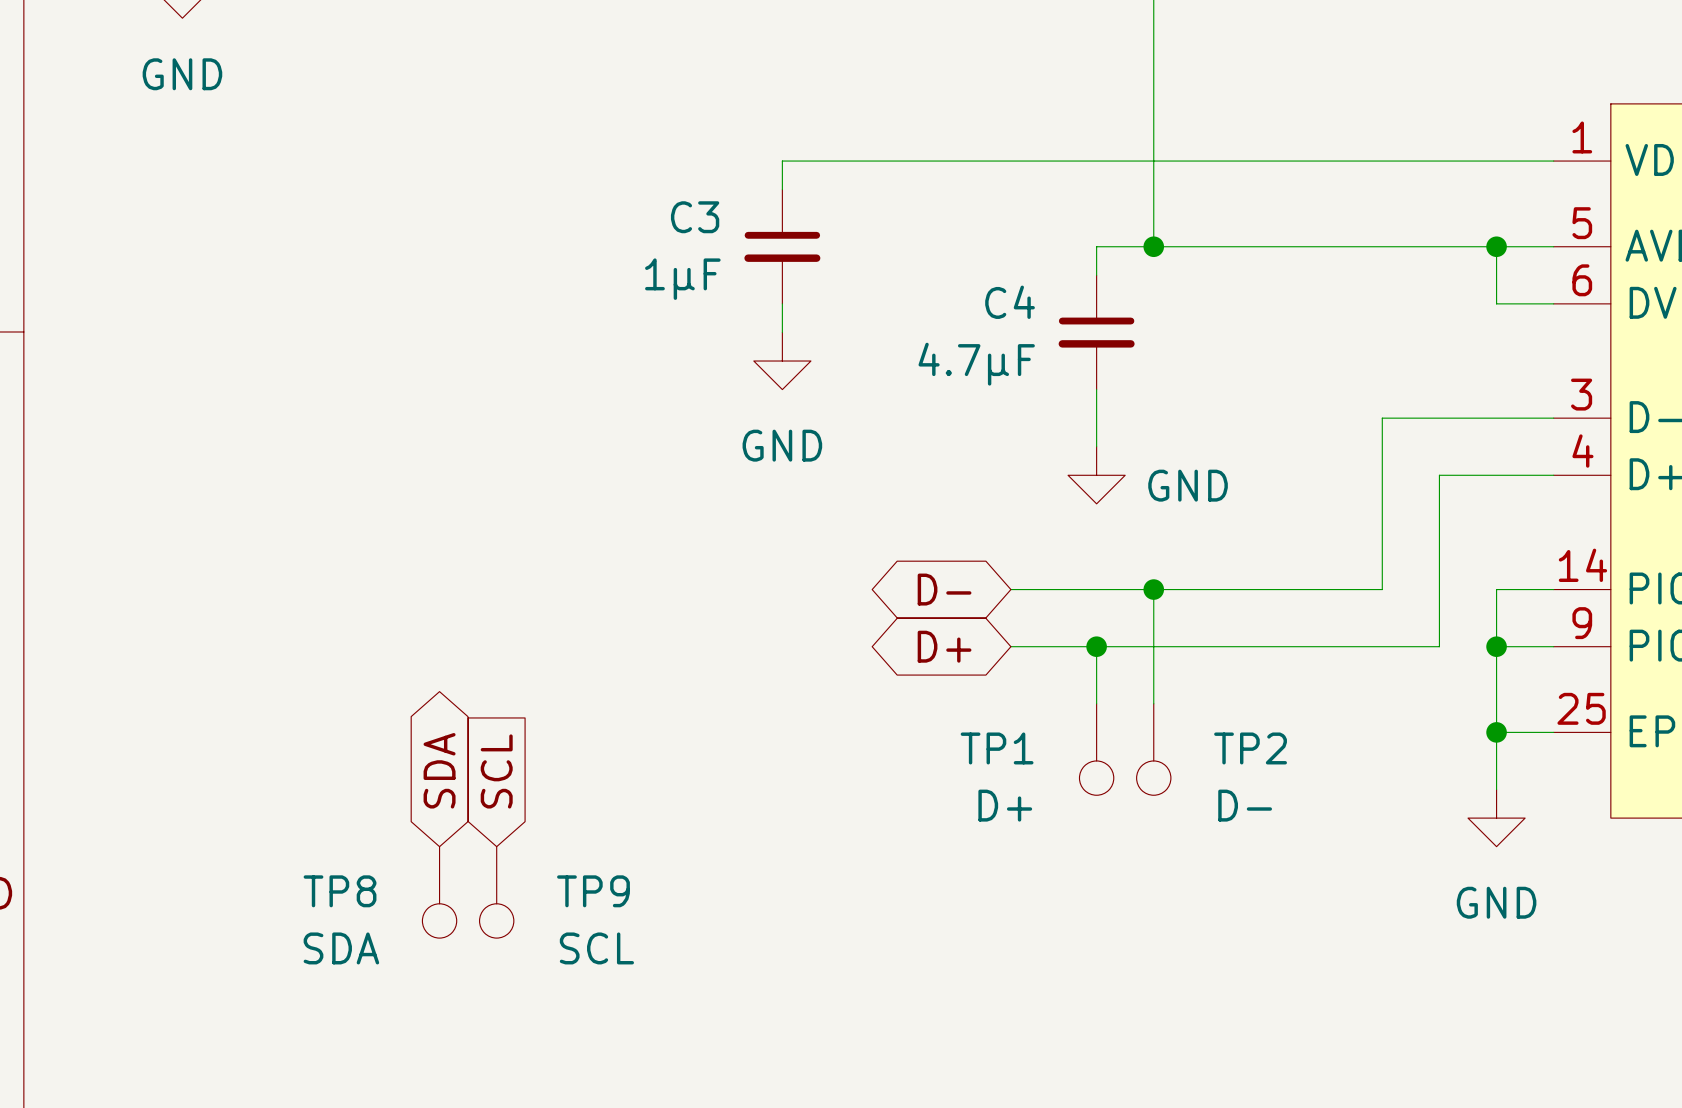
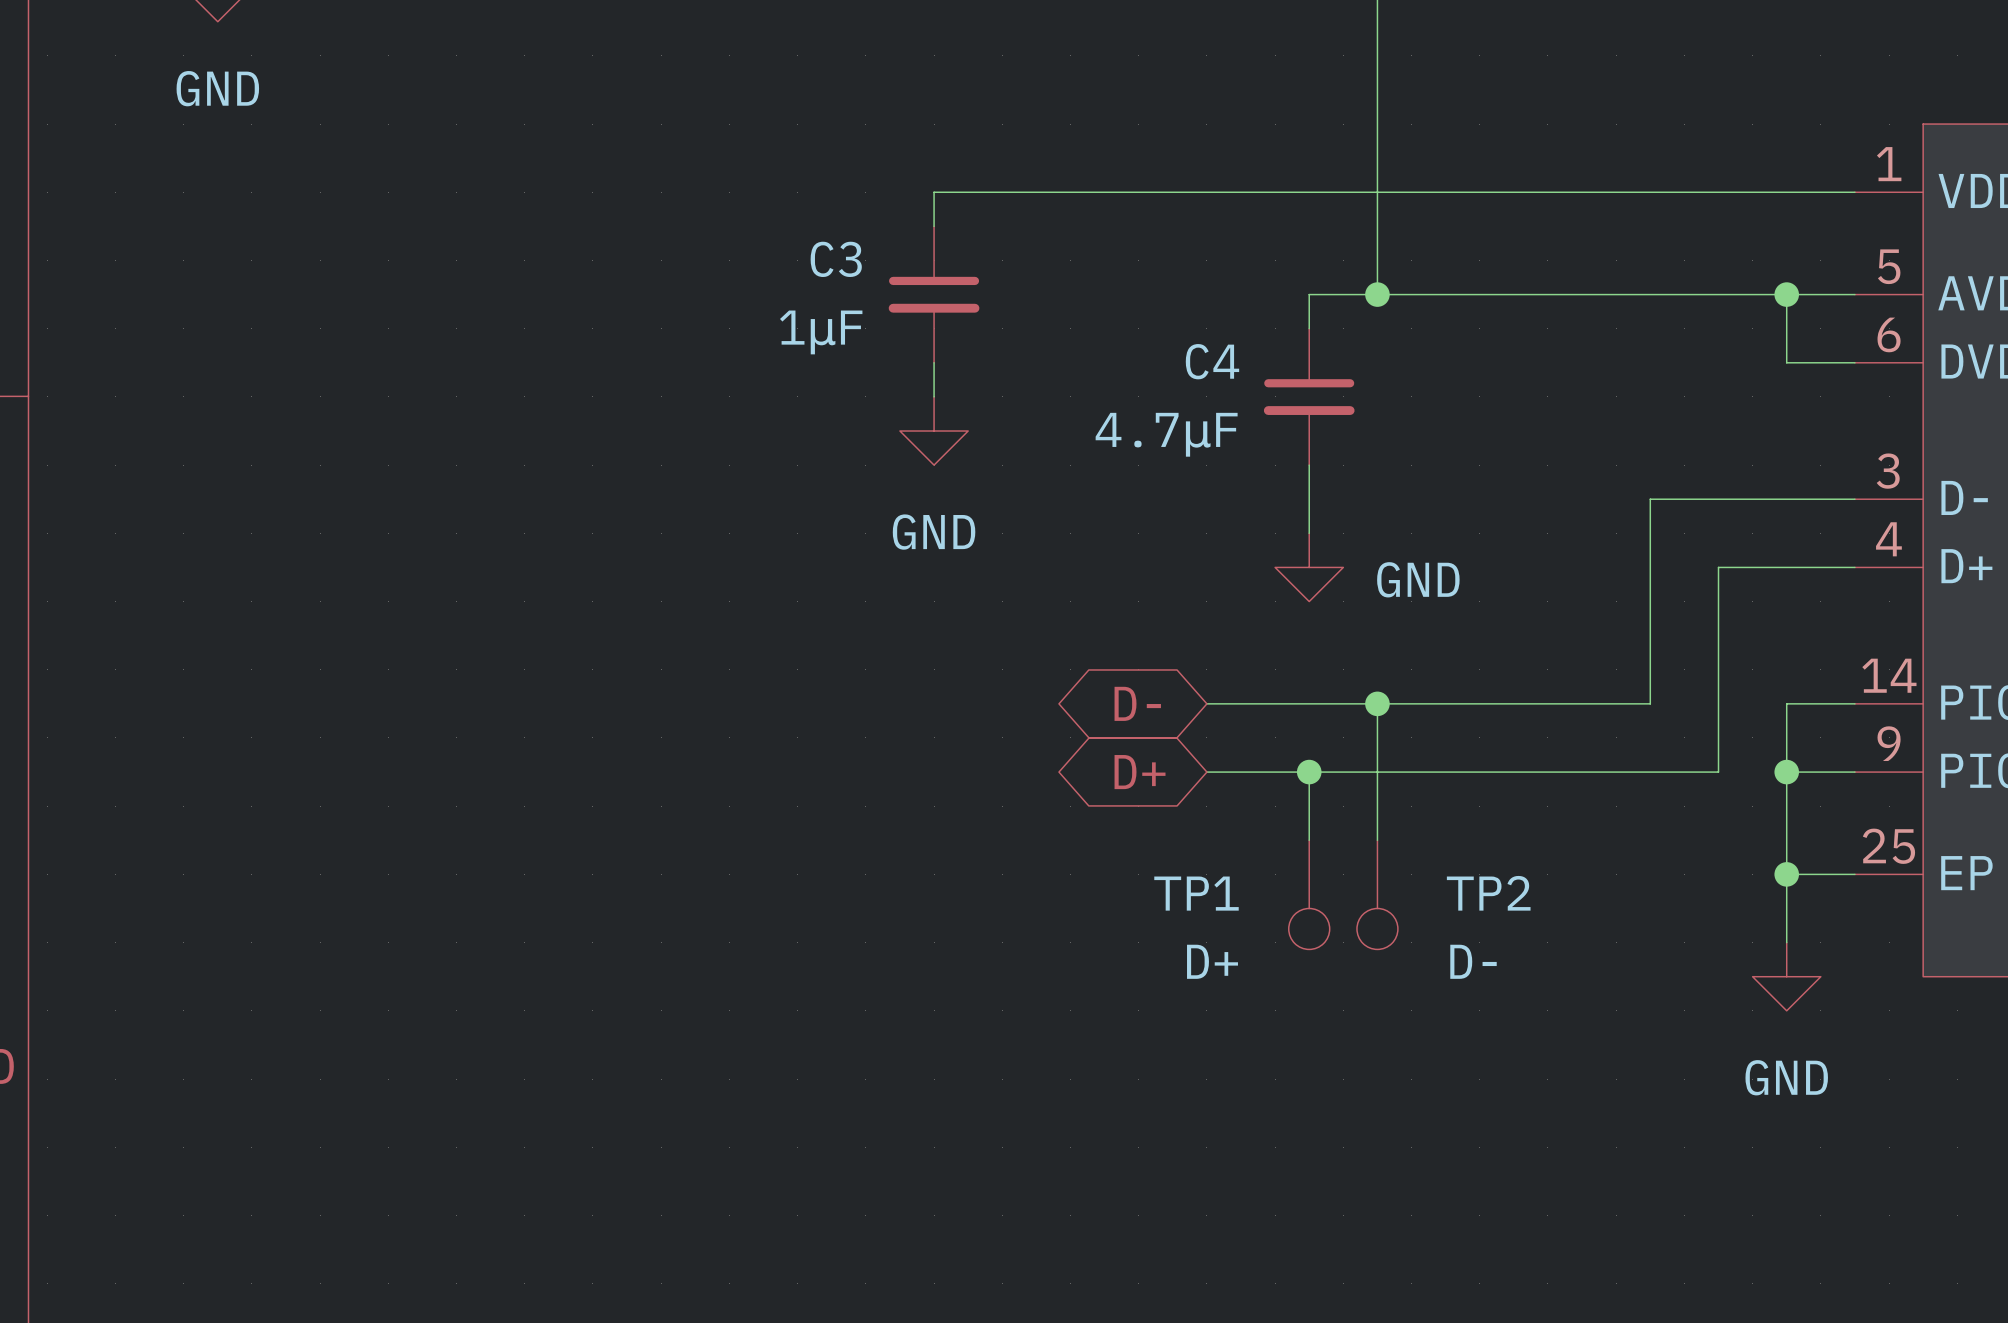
global label: SDA (439, 770) -> none
global label: SCL (496, 771) -> none
TP8: SDA (439, 892) -> none
TP9: SCL (496, 892) -> none

